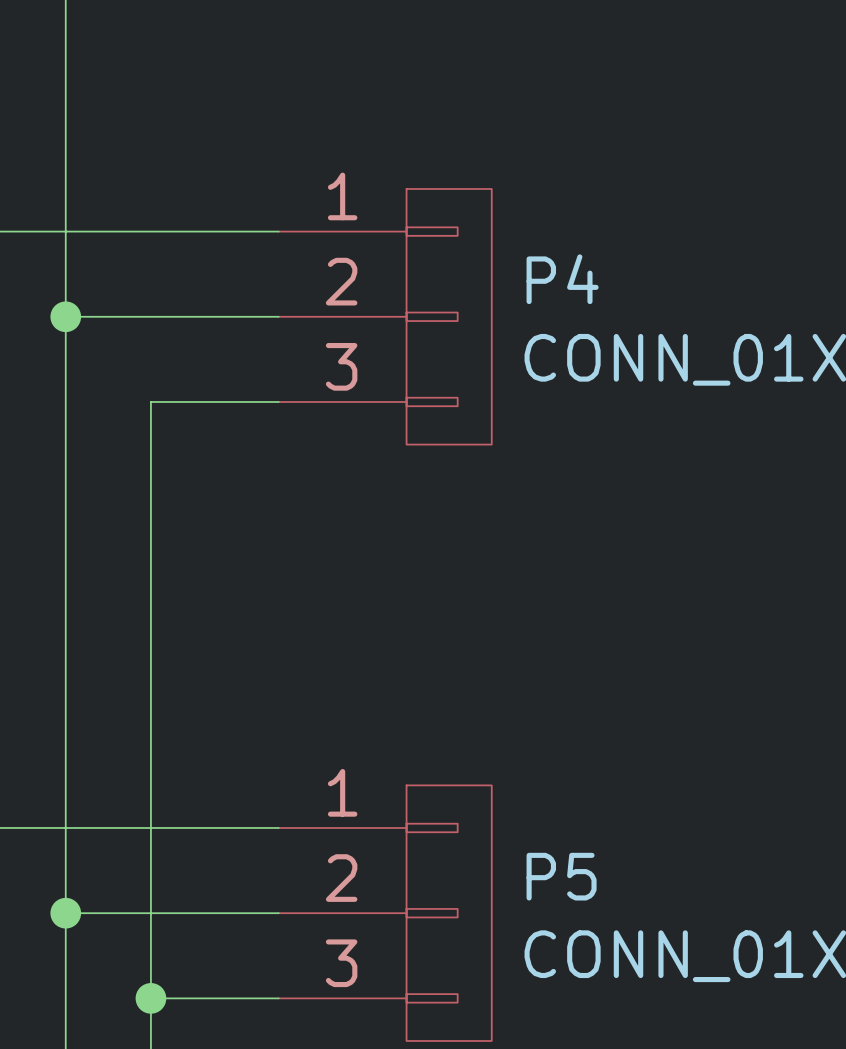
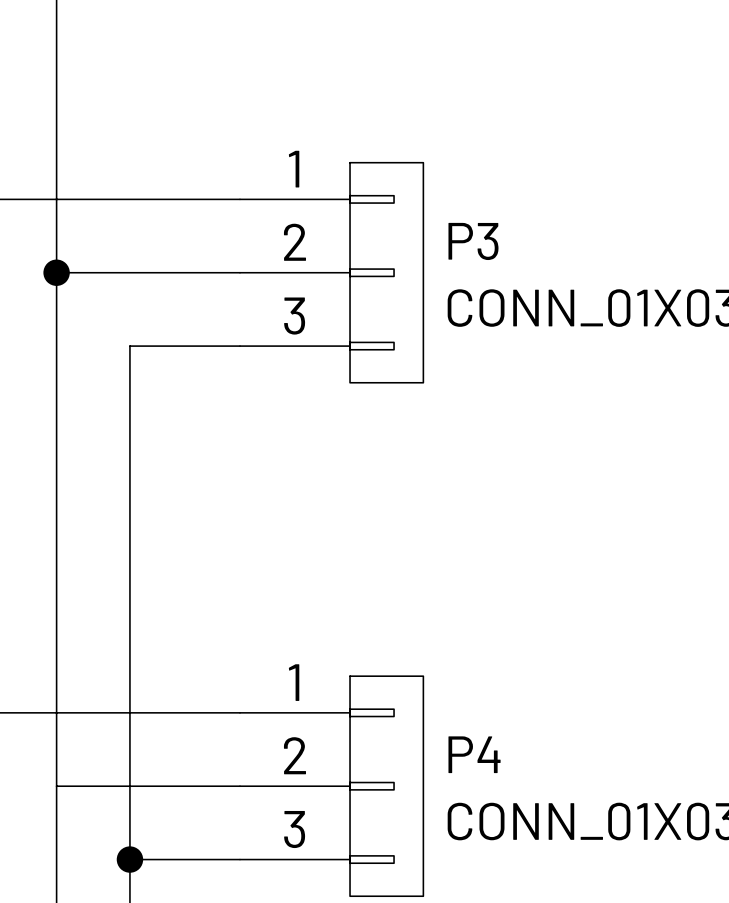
P4 name: P4 (562, 279) -> P3 (473, 241)
P5 name: P5 (561, 876) -> P4 (474, 754)
junction: (65, 913) -> none

